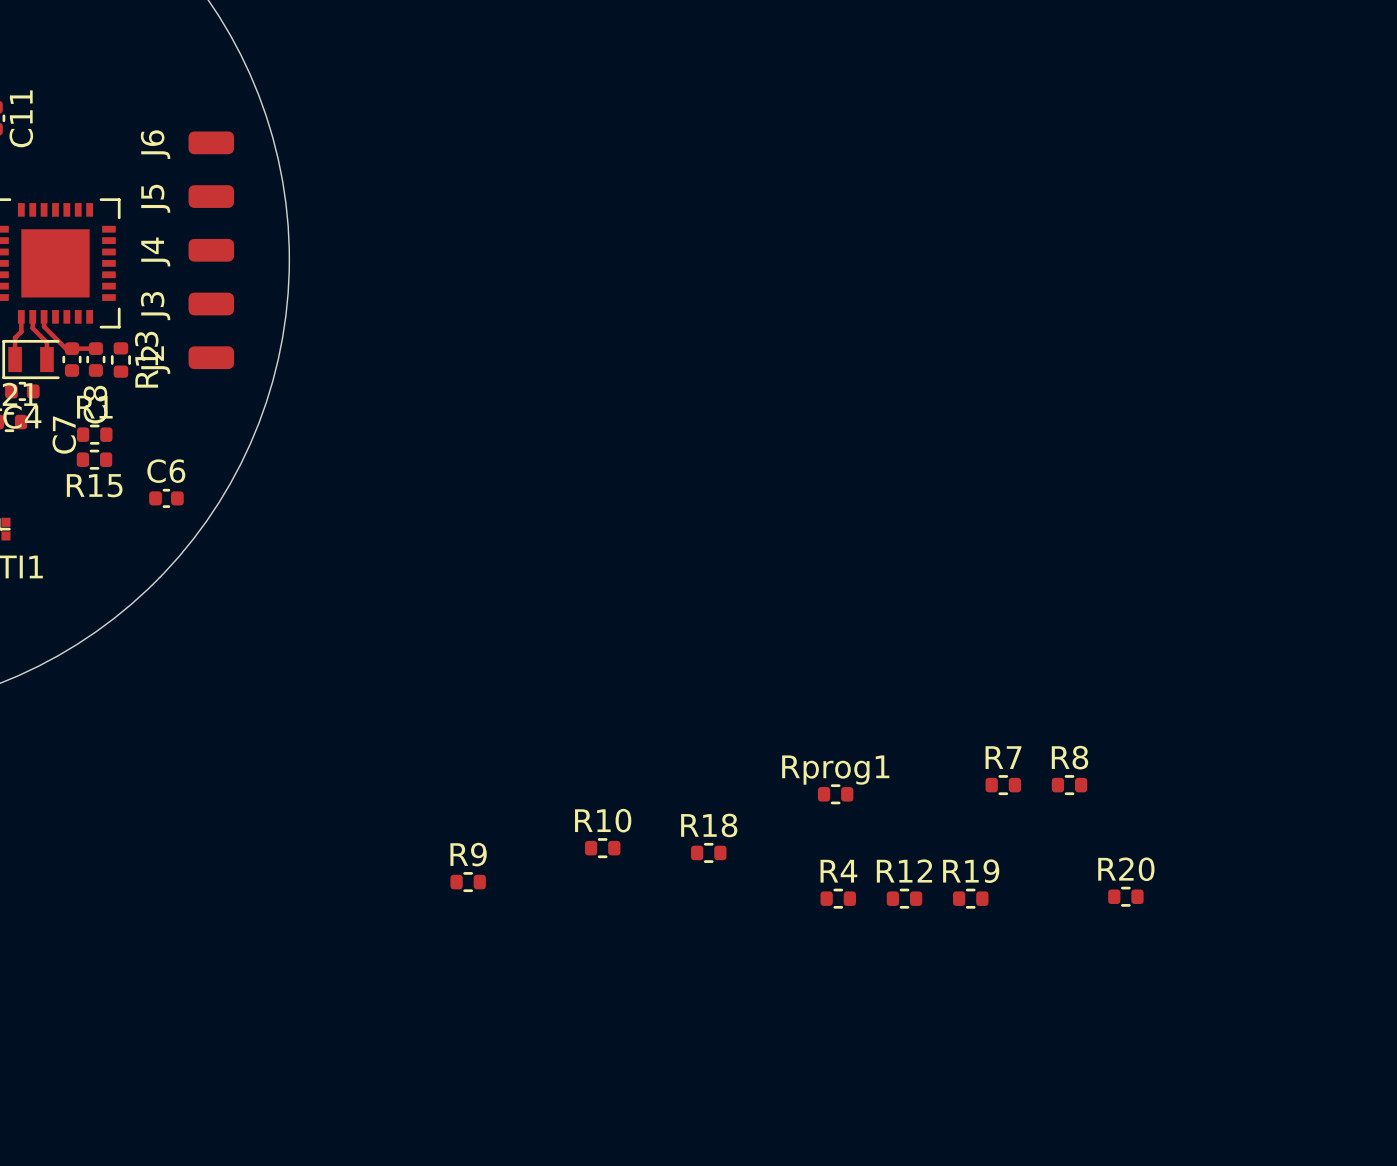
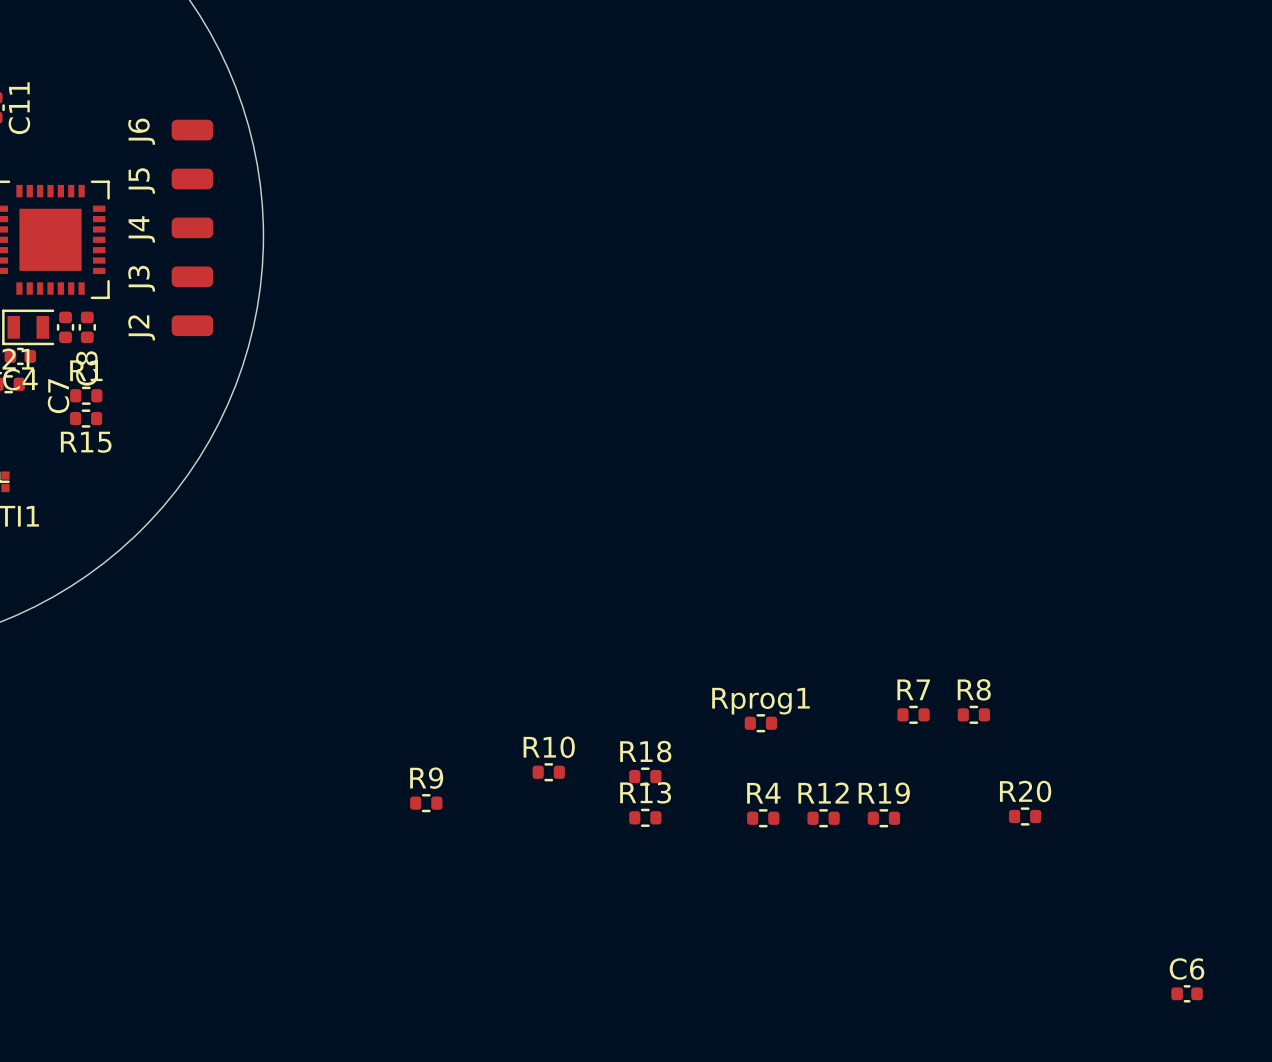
track: (21, 316) (21, 331) (15, 337) (15, 359) -> none
track: (32, 316) (32, 328) (46, 342) (46, 359) -> none
track: (44, 316) (44, 326) (65, 348) (93, 348) -> none
R13 rotation: 0° (120, 360) -> 90° clockwise (645, 817)
R13 position: (120, 360) -> (645, 817)
C6 position: (166, 498) -> (1187, 993)

